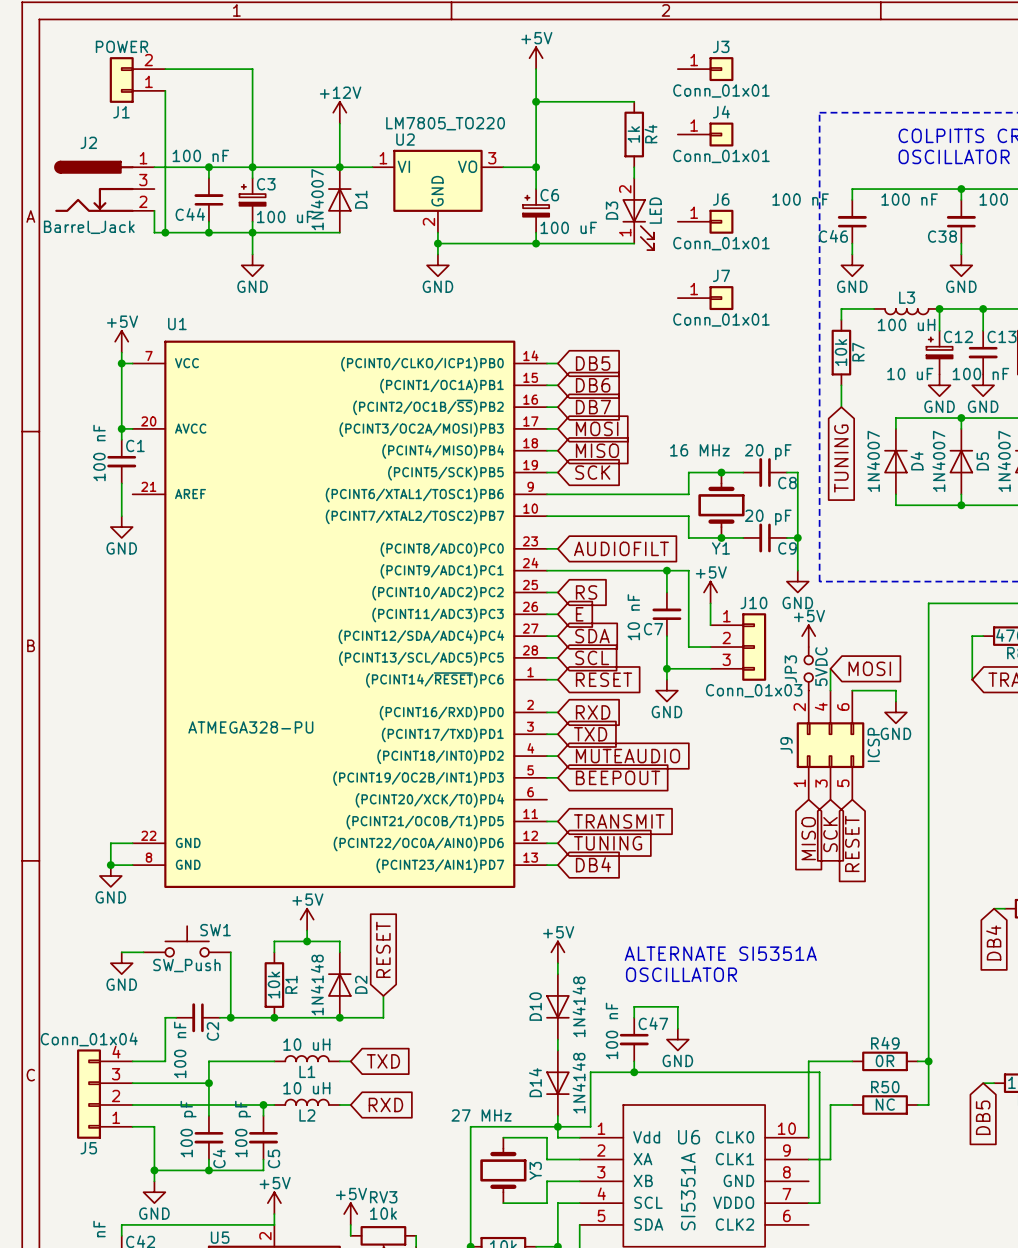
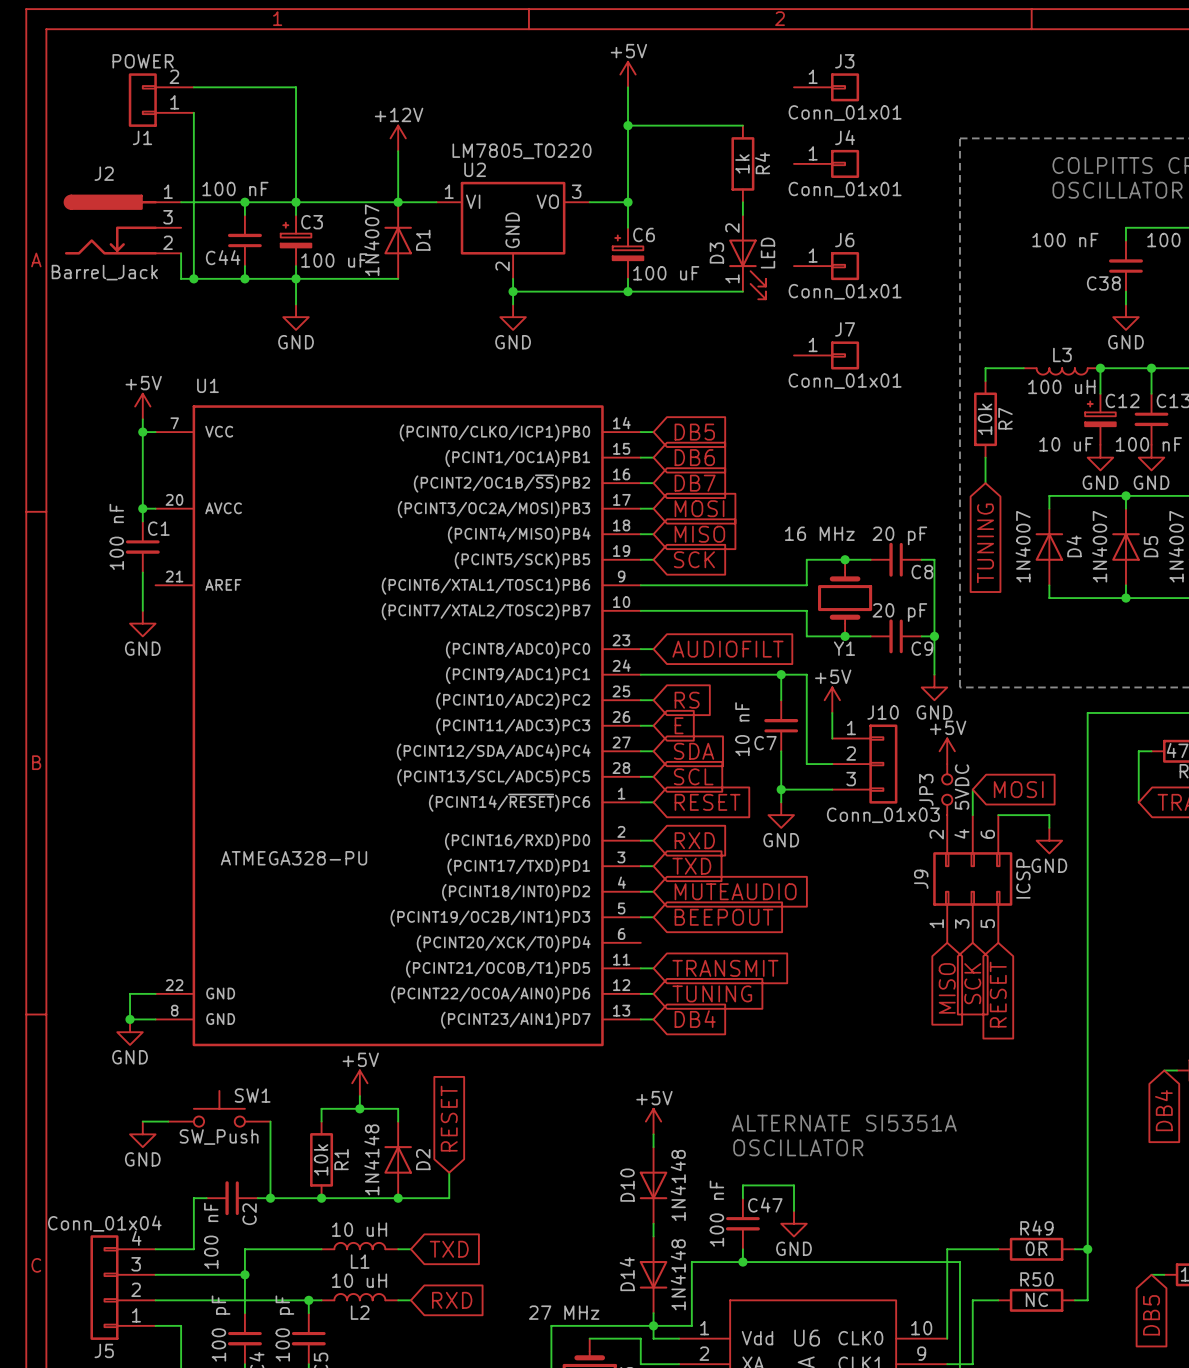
wire: (961, 189) (852, 189) (852, 199) -> none
junction: (961, 189) -> none
C46: 100 nF (852, 221) -> none
wire: (852, 243) (852, 254) -> none
power symbol: GND (852, 265) -> none

